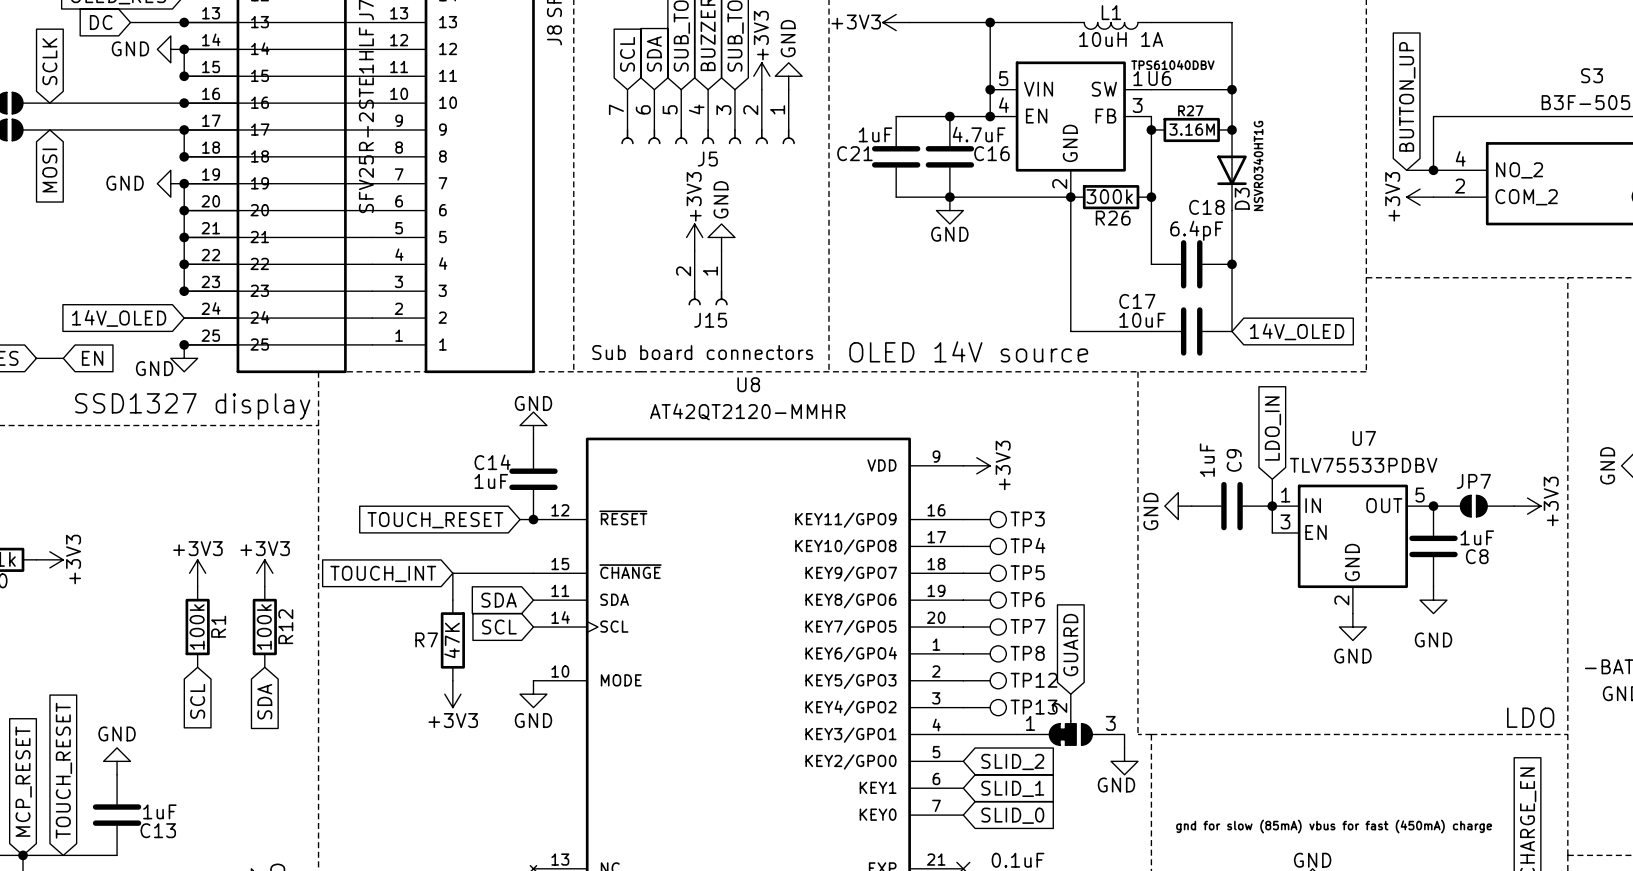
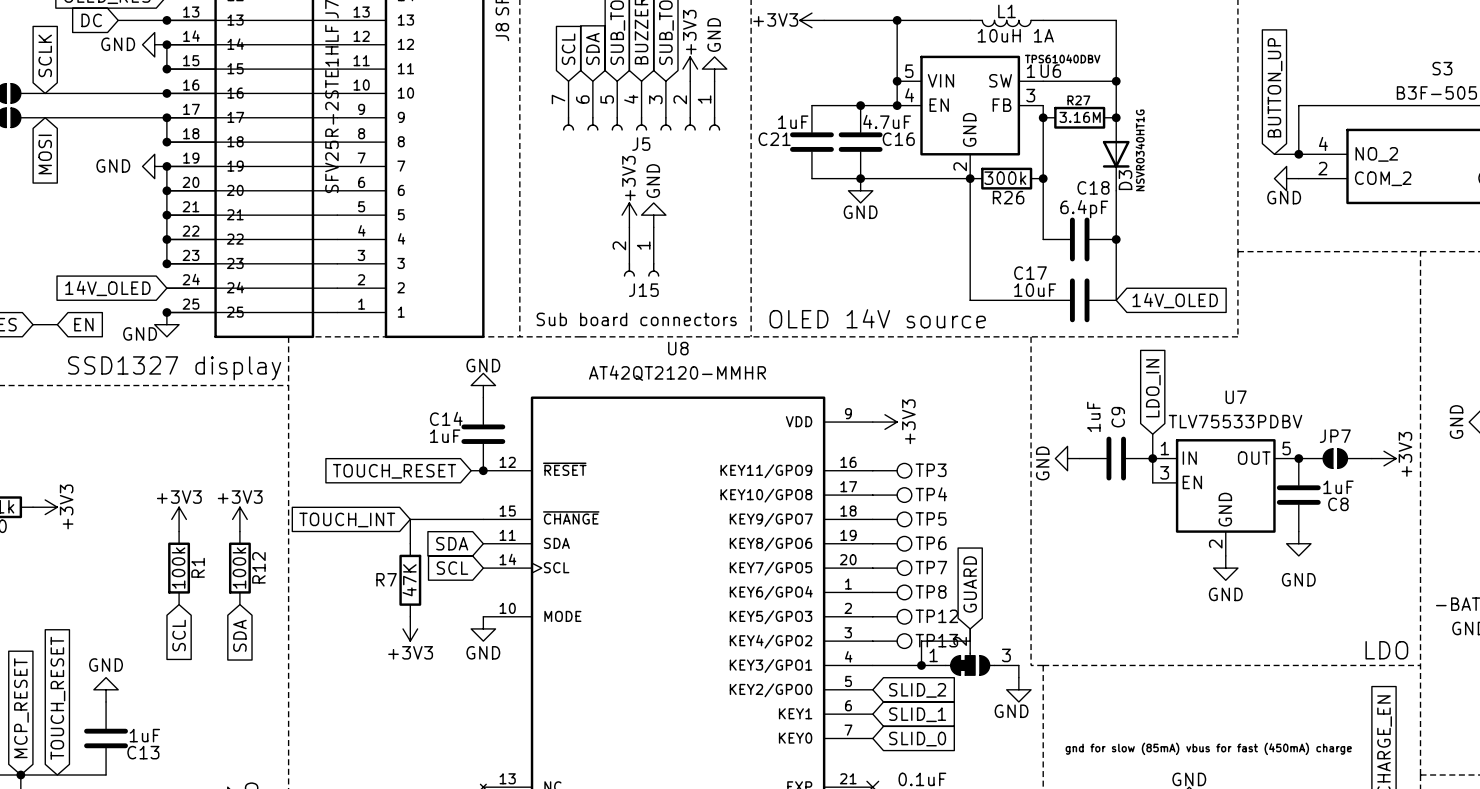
power symbol: +3V3 (1420, 197) -> GND (1286, 178)
wire: none -> (970, 628) (970, 641) (921, 641) (921, 665)
junction: none -> (921, 665)

